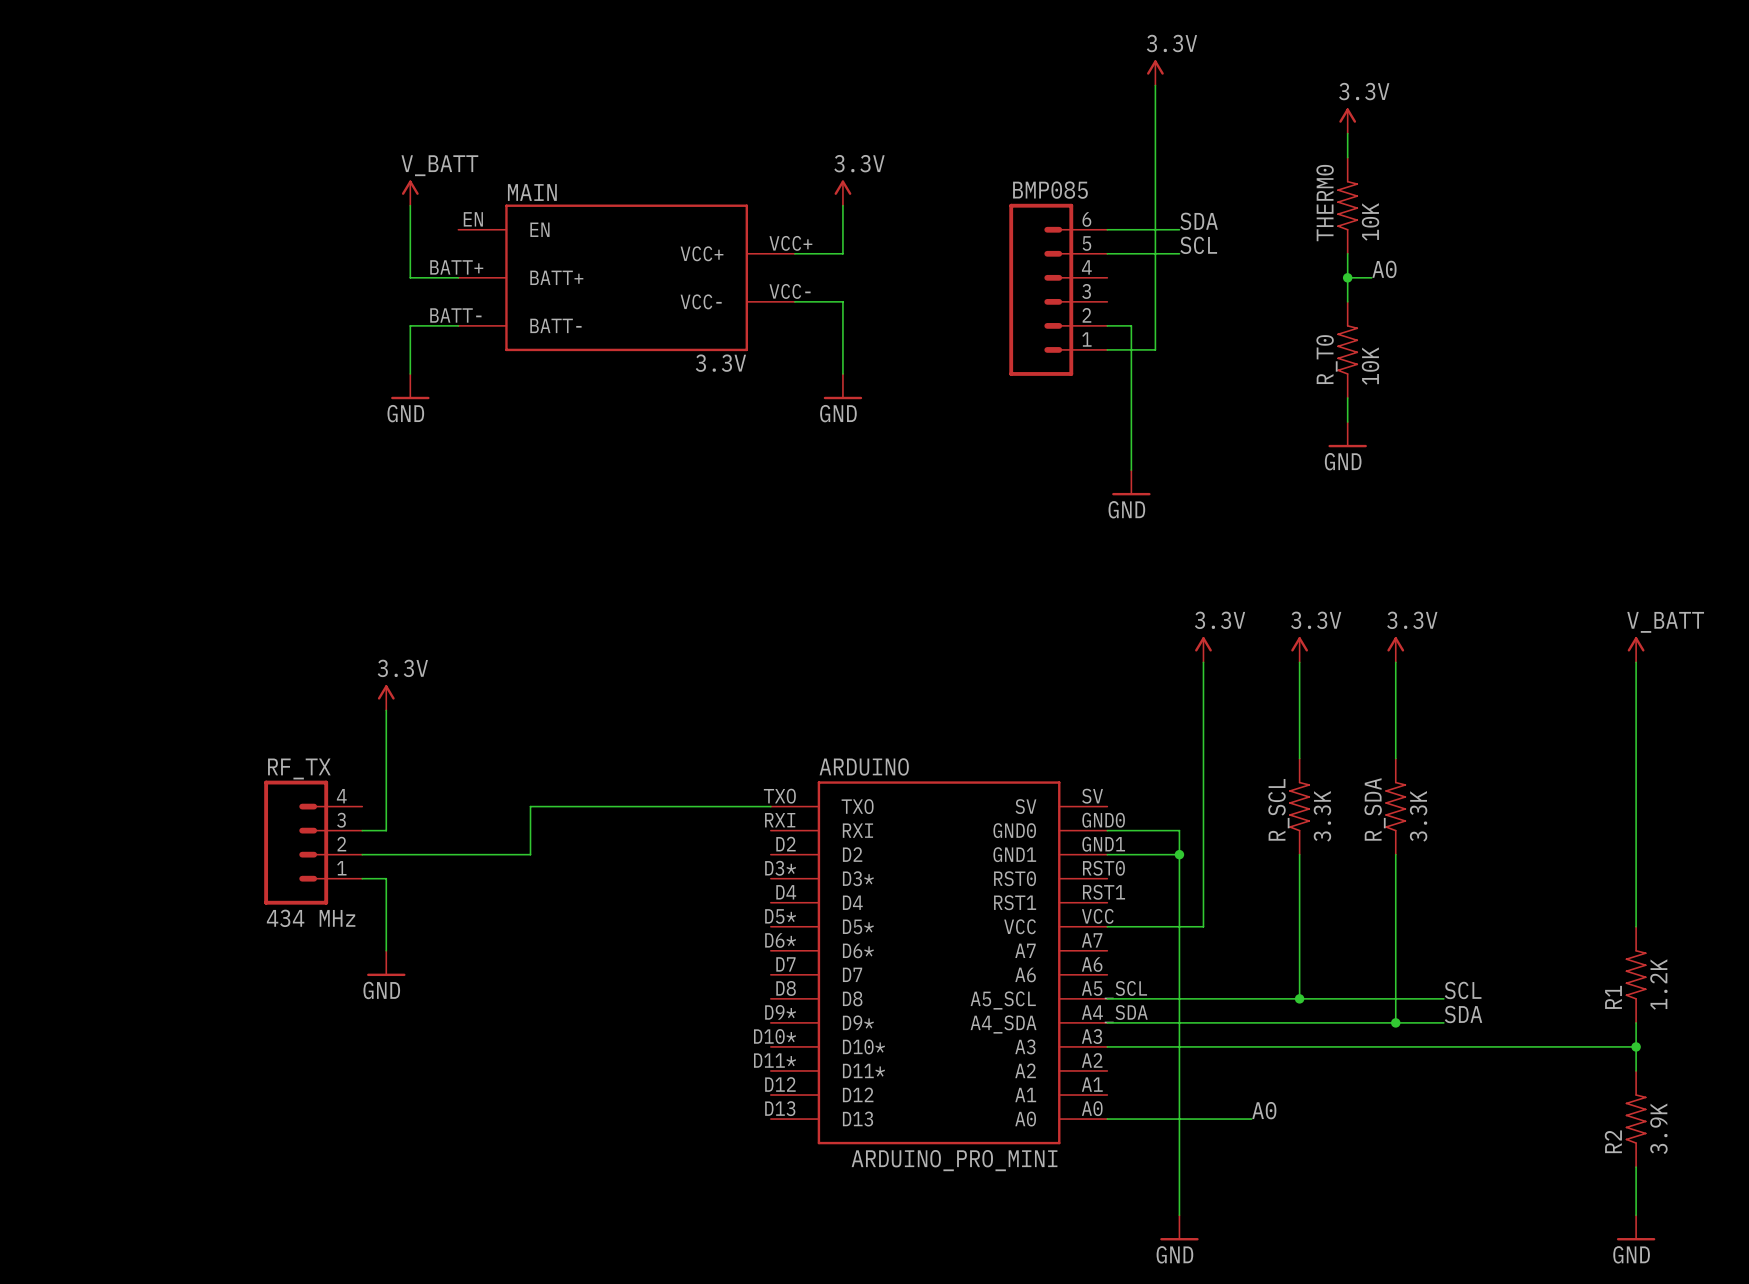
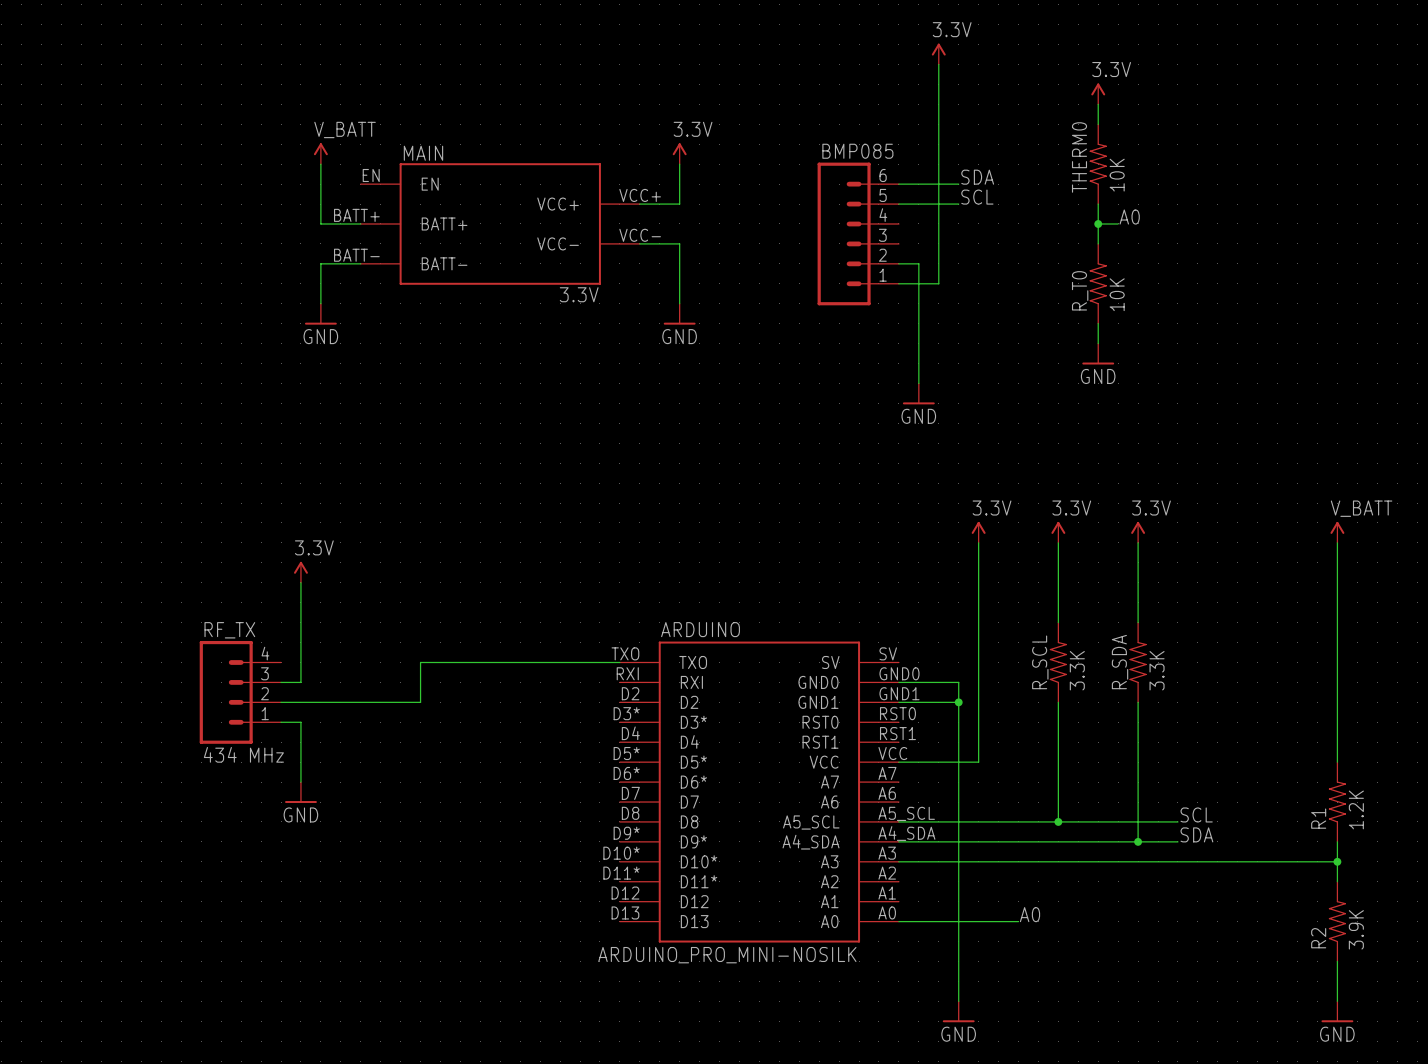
ARDUINO value: ARDUINO_PRO_MINI (954, 1160) -> ARDUINO_PRO_MINI-NOSILK (727, 955)

